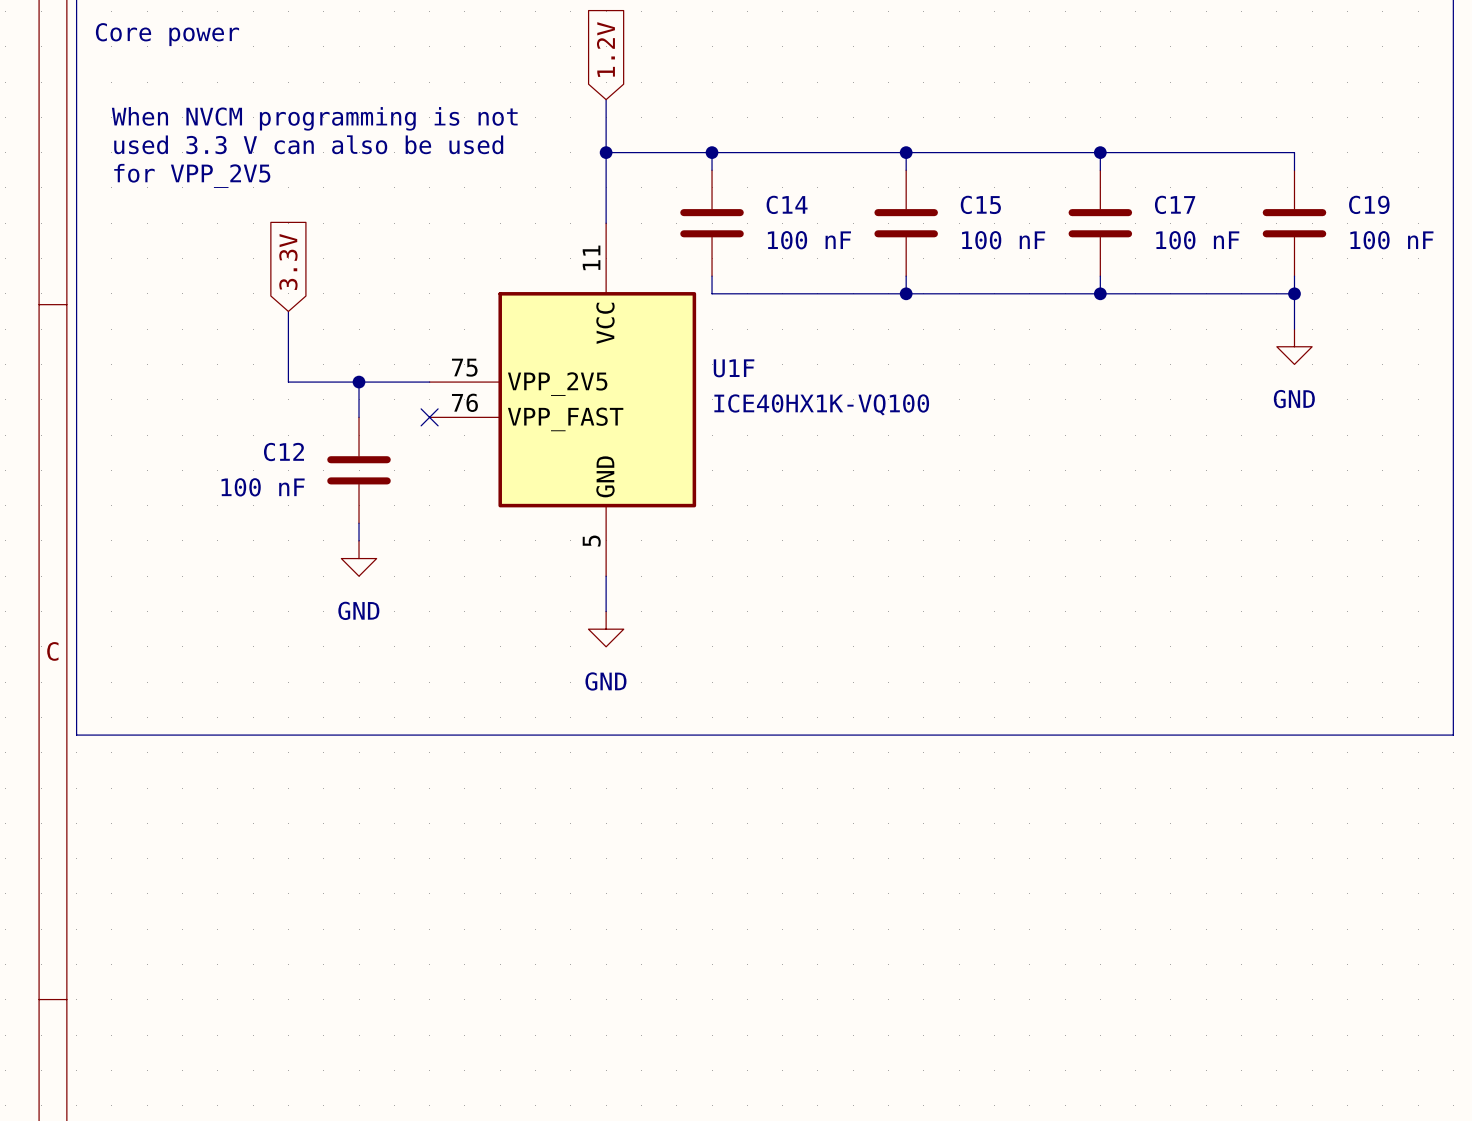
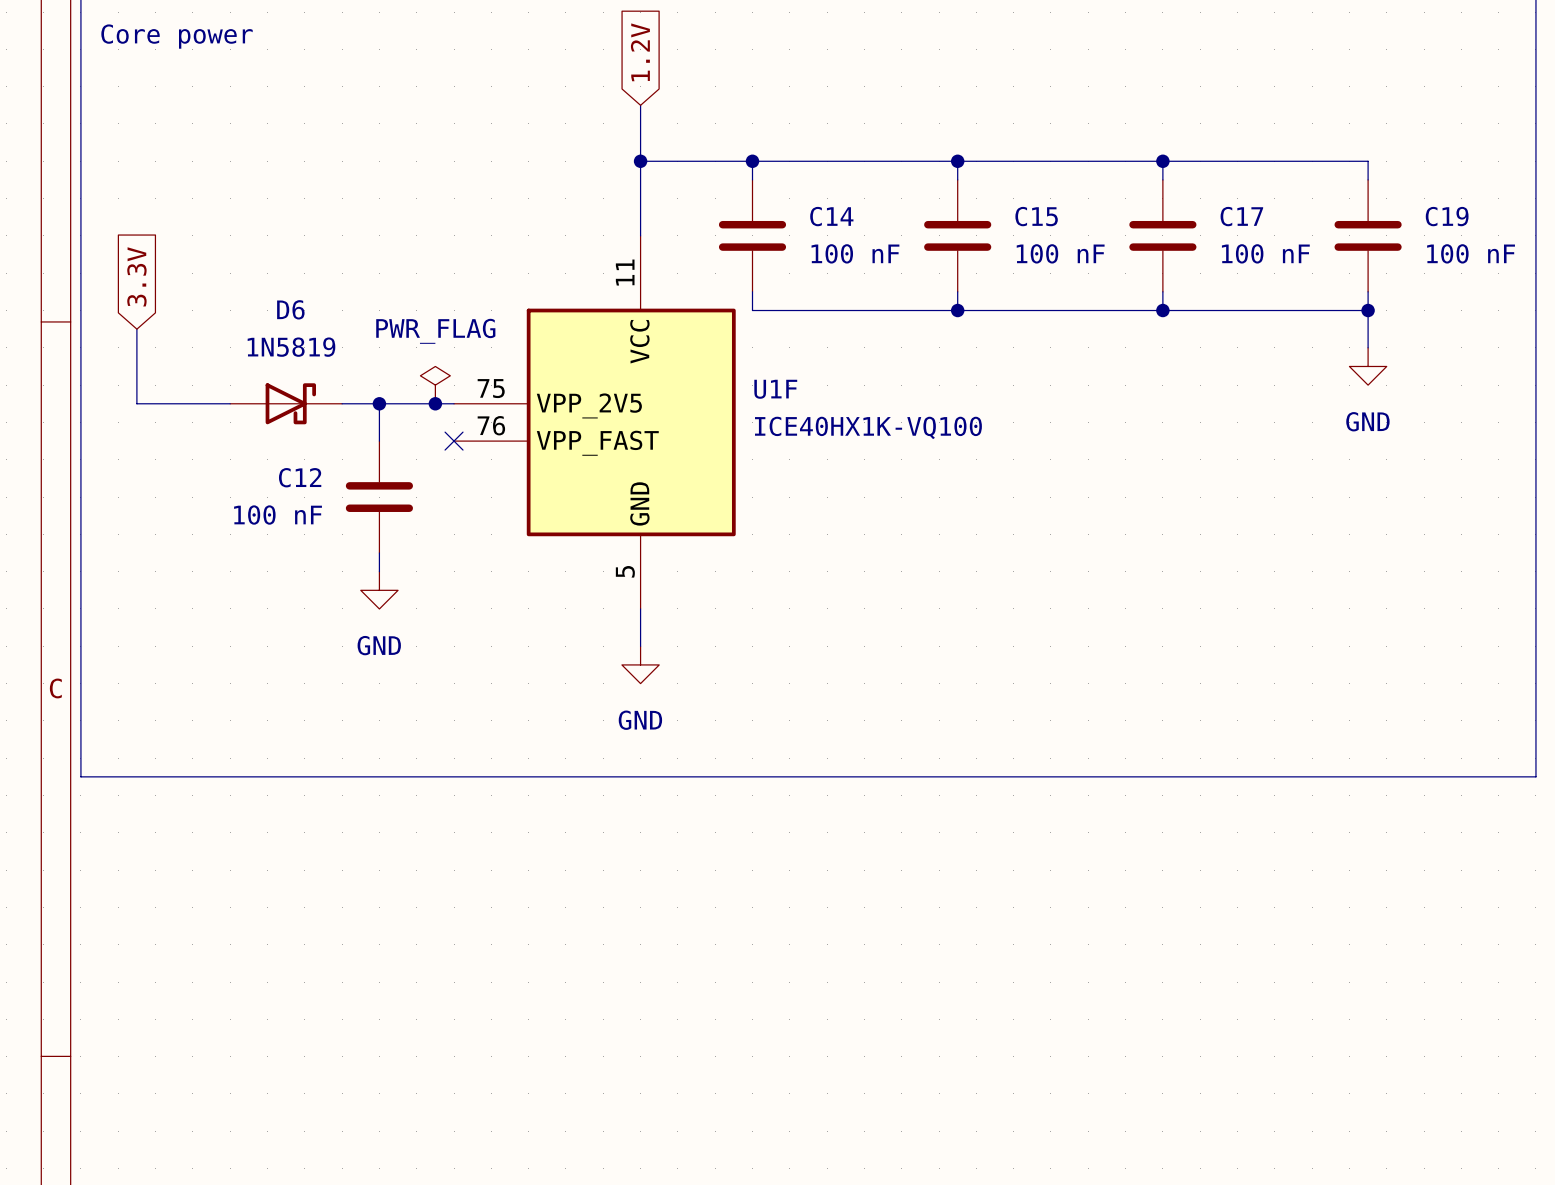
text: When NVCM programming is not (314, 118) -> none
text: used 3.3 V can also be used (308, 144) -> none
text: for VPP_2V5 (192, 175) -> none
global label position: 3.3V (288, 261) -> 3.3V (136, 276)
wire: none -> (136, 329) (136, 403) (230, 403)
wire: (288, 311) (288, 382) (323, 382) -> none
power symbol: none -> PWR_FLAG (435, 385)
D6: none -> 1N5819 (286, 403)
junction: none -> (435, 403)

